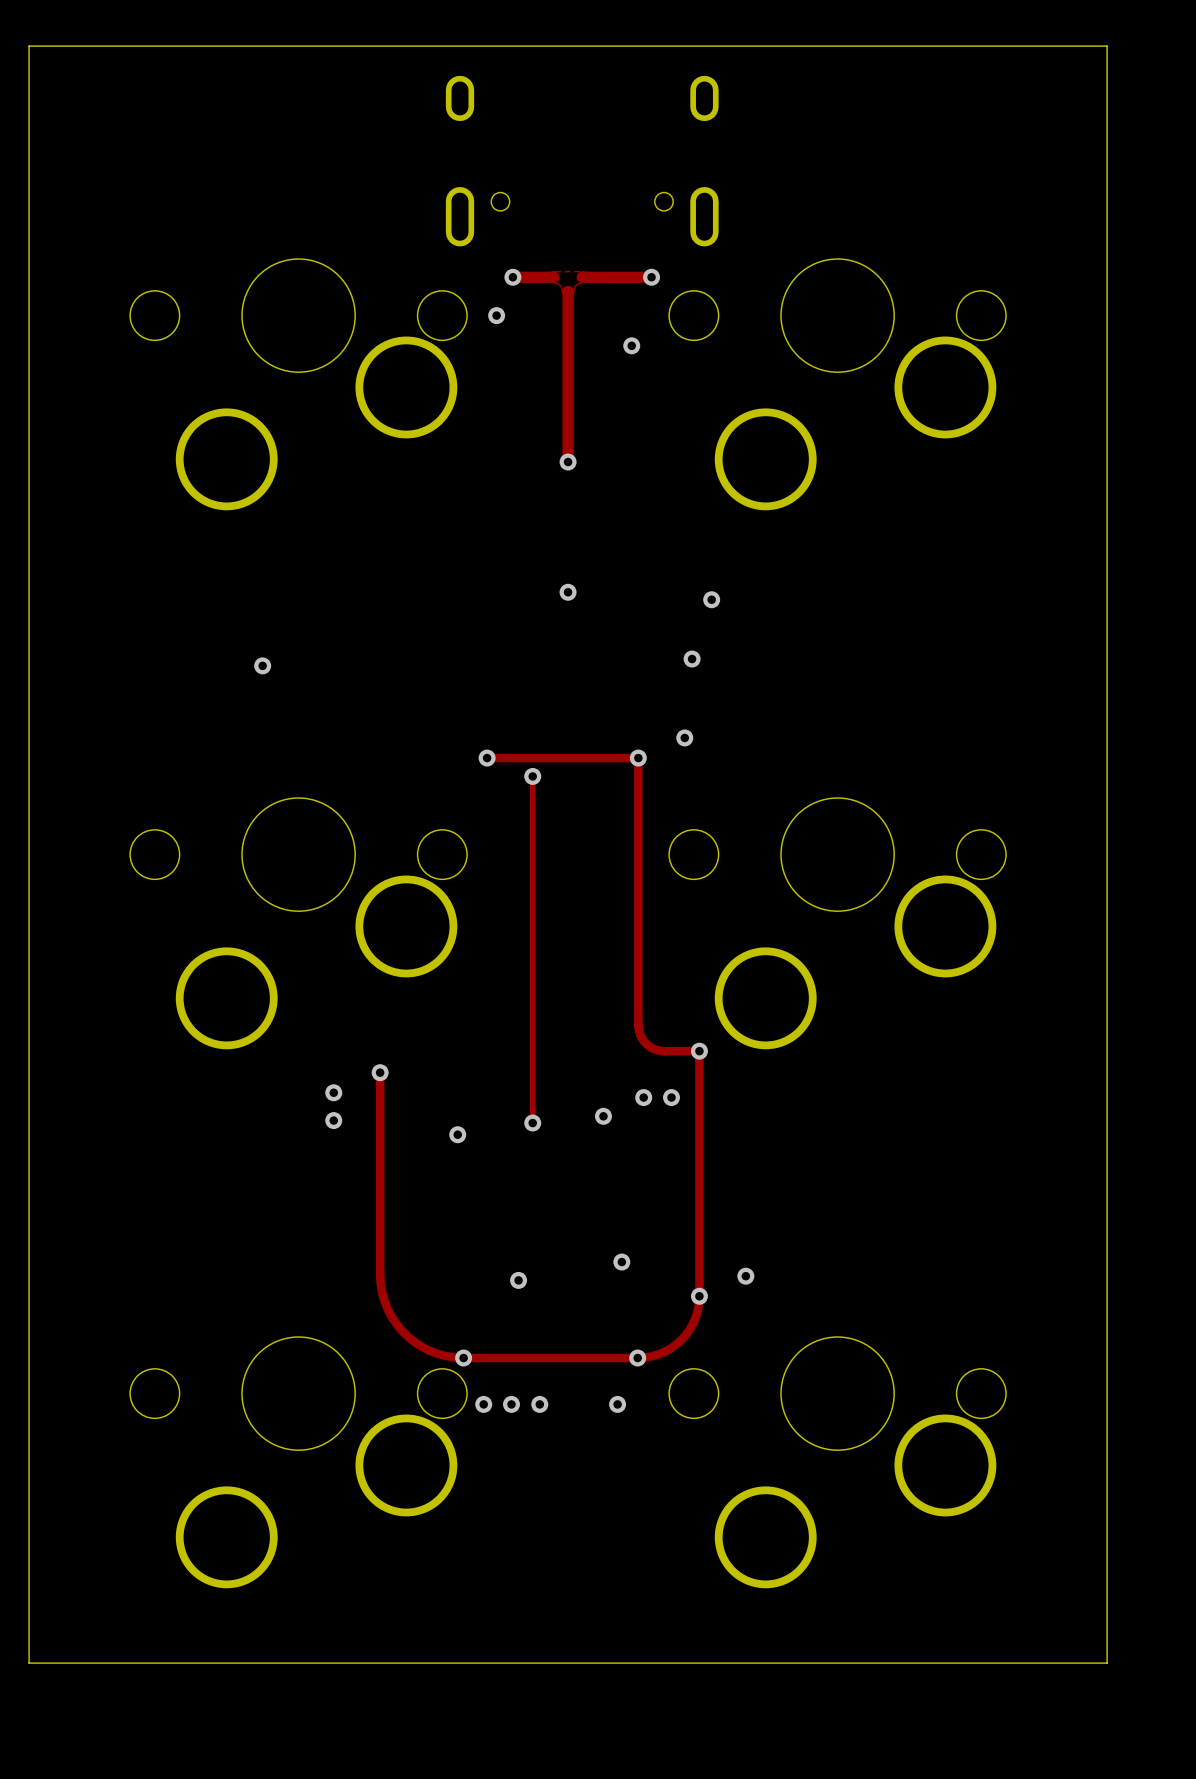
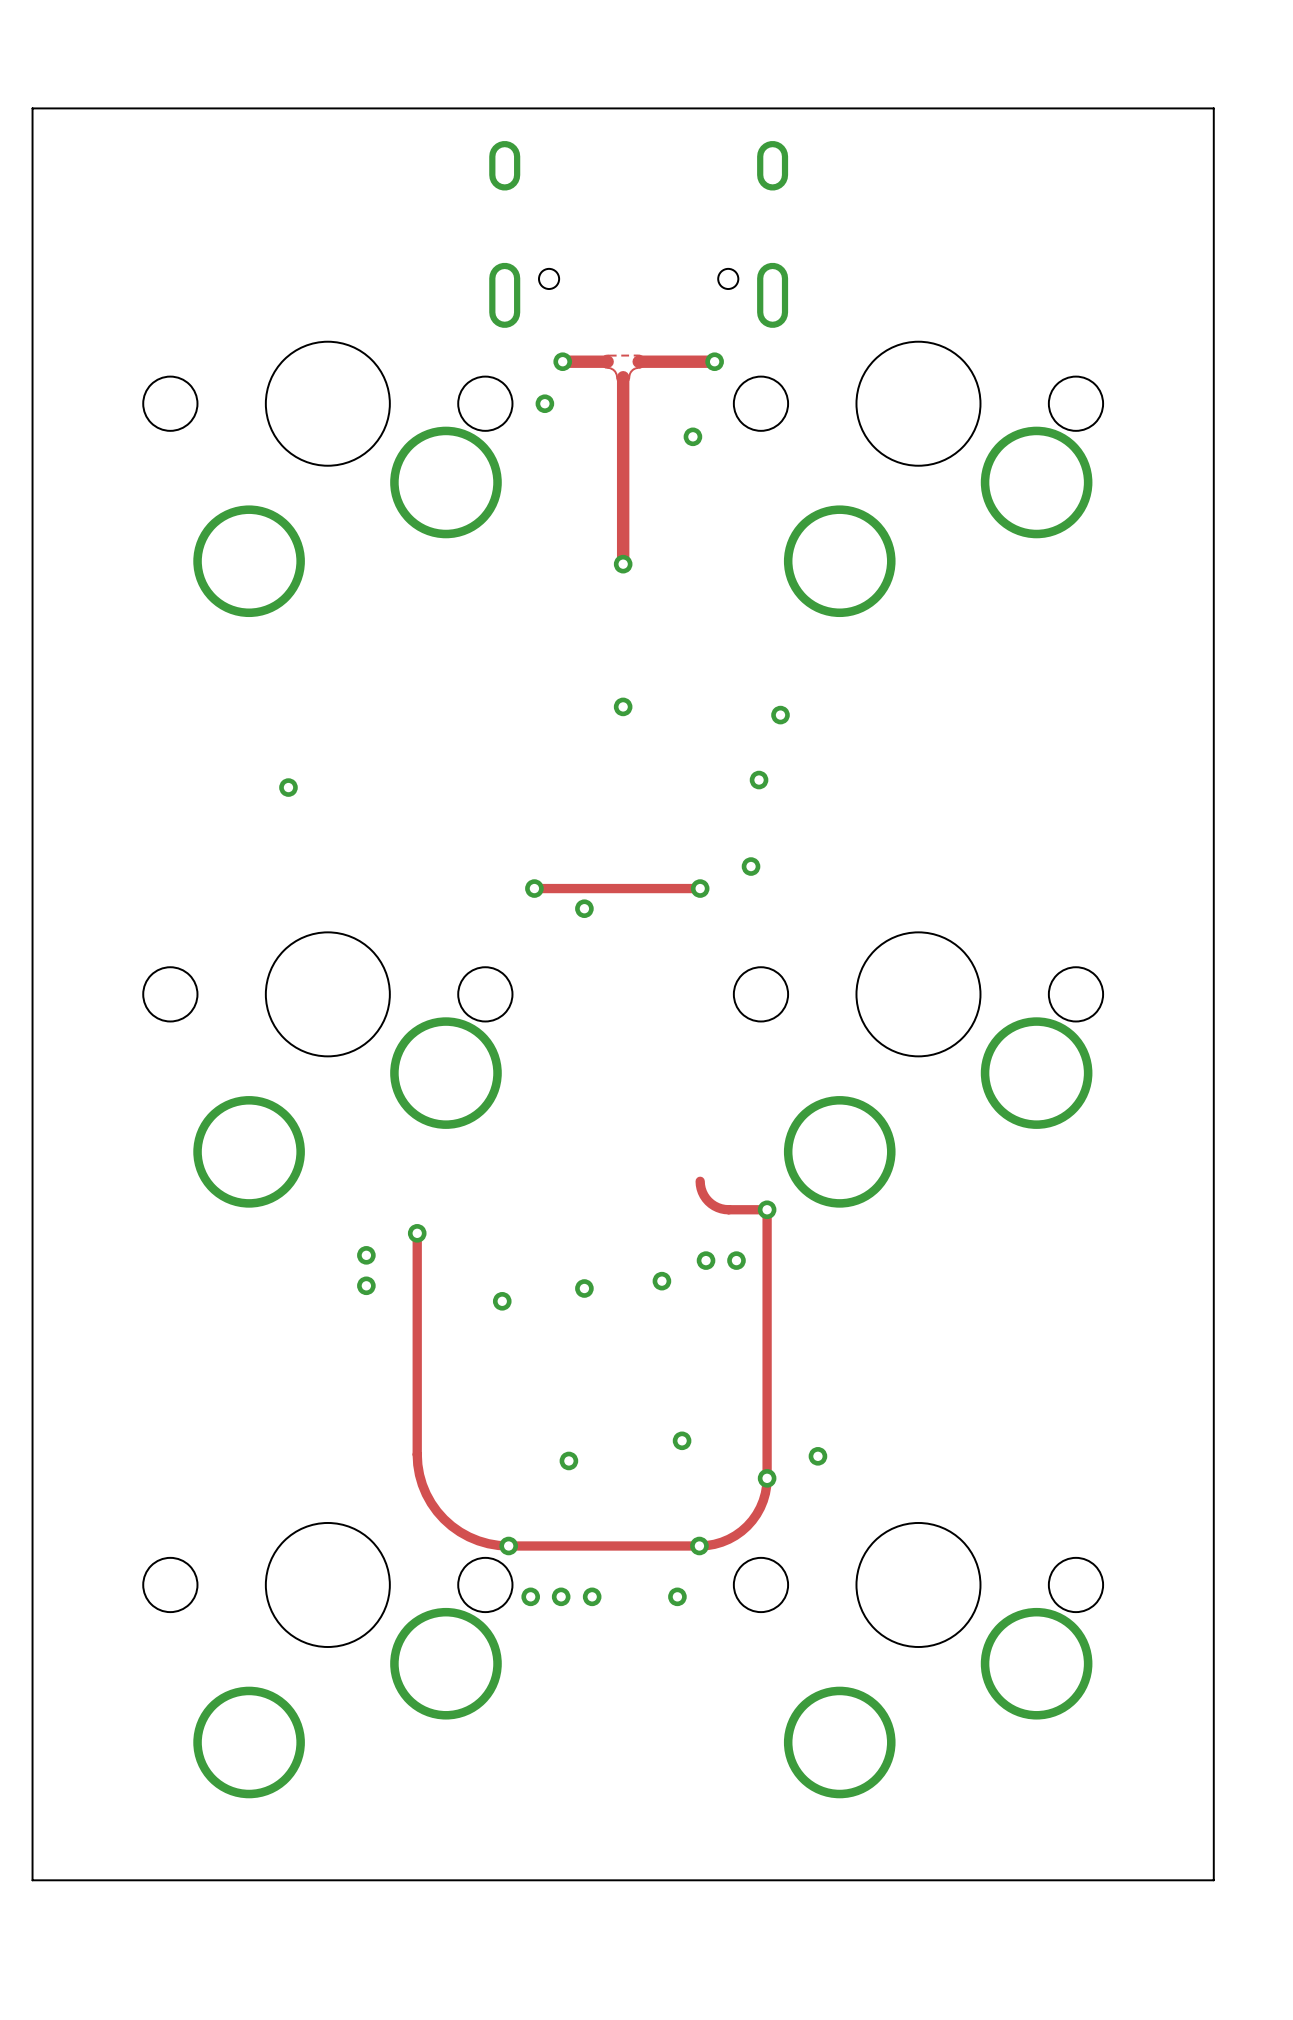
track: (638, 758) (638, 1025) -> none
track: (532, 776) (532, 1123) -> none

